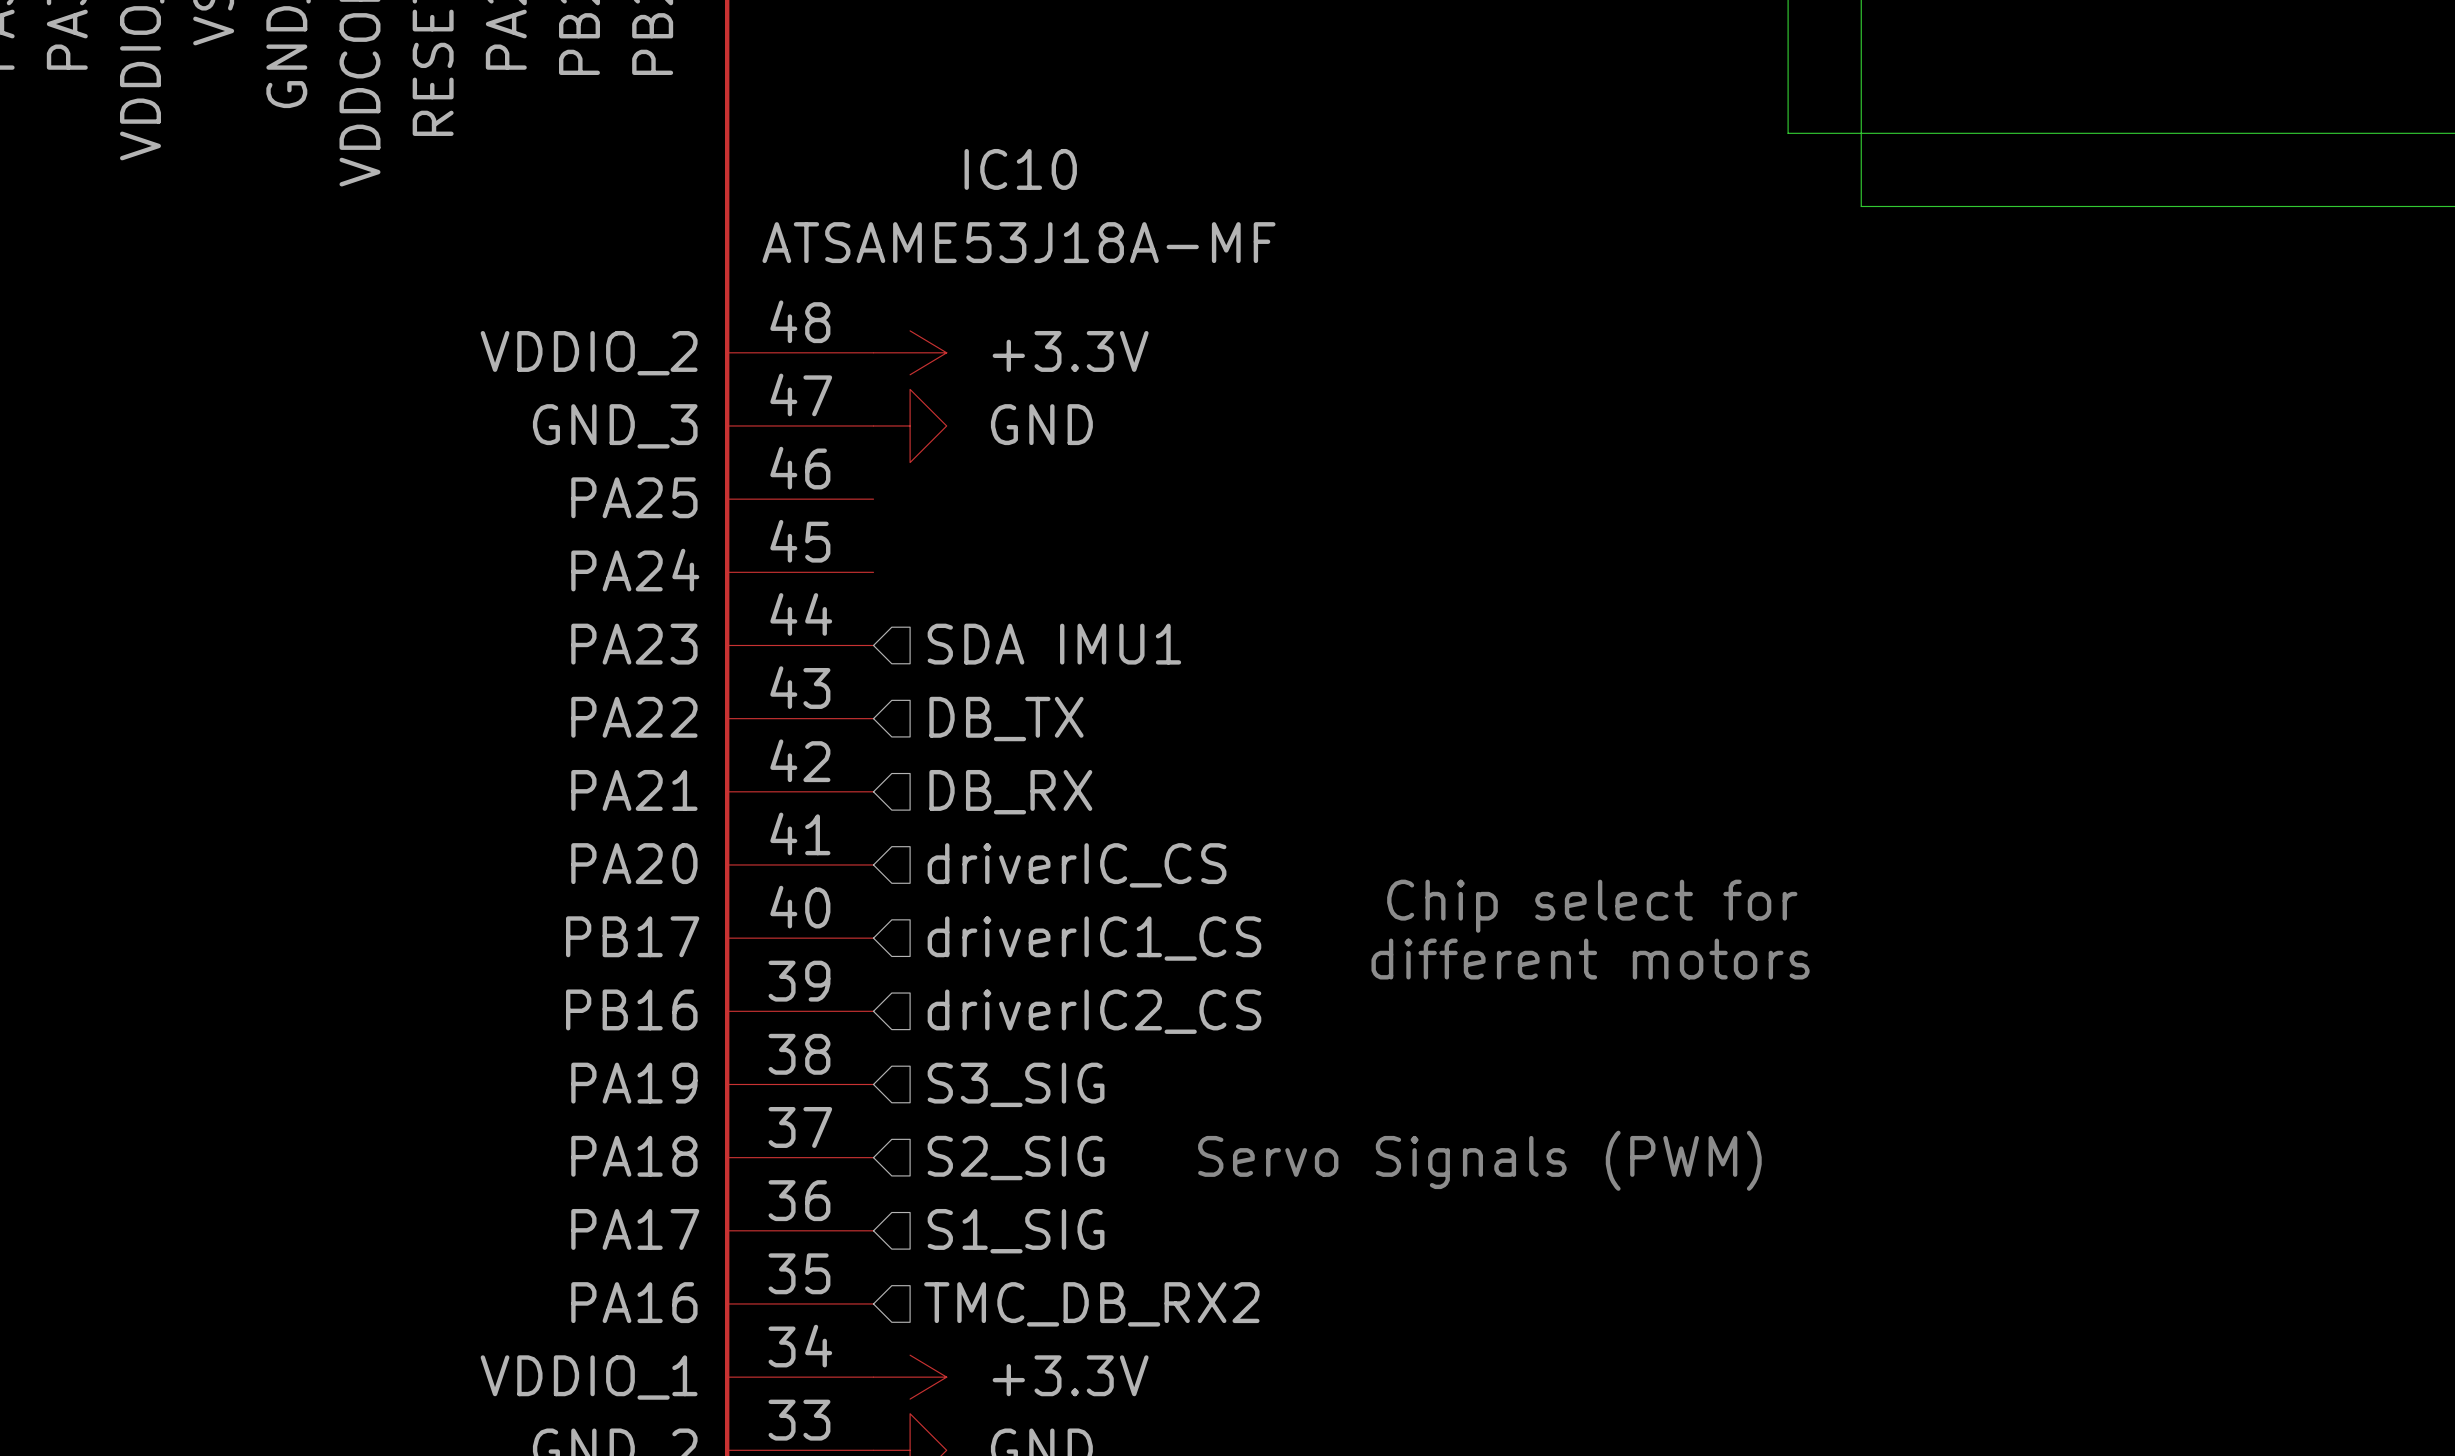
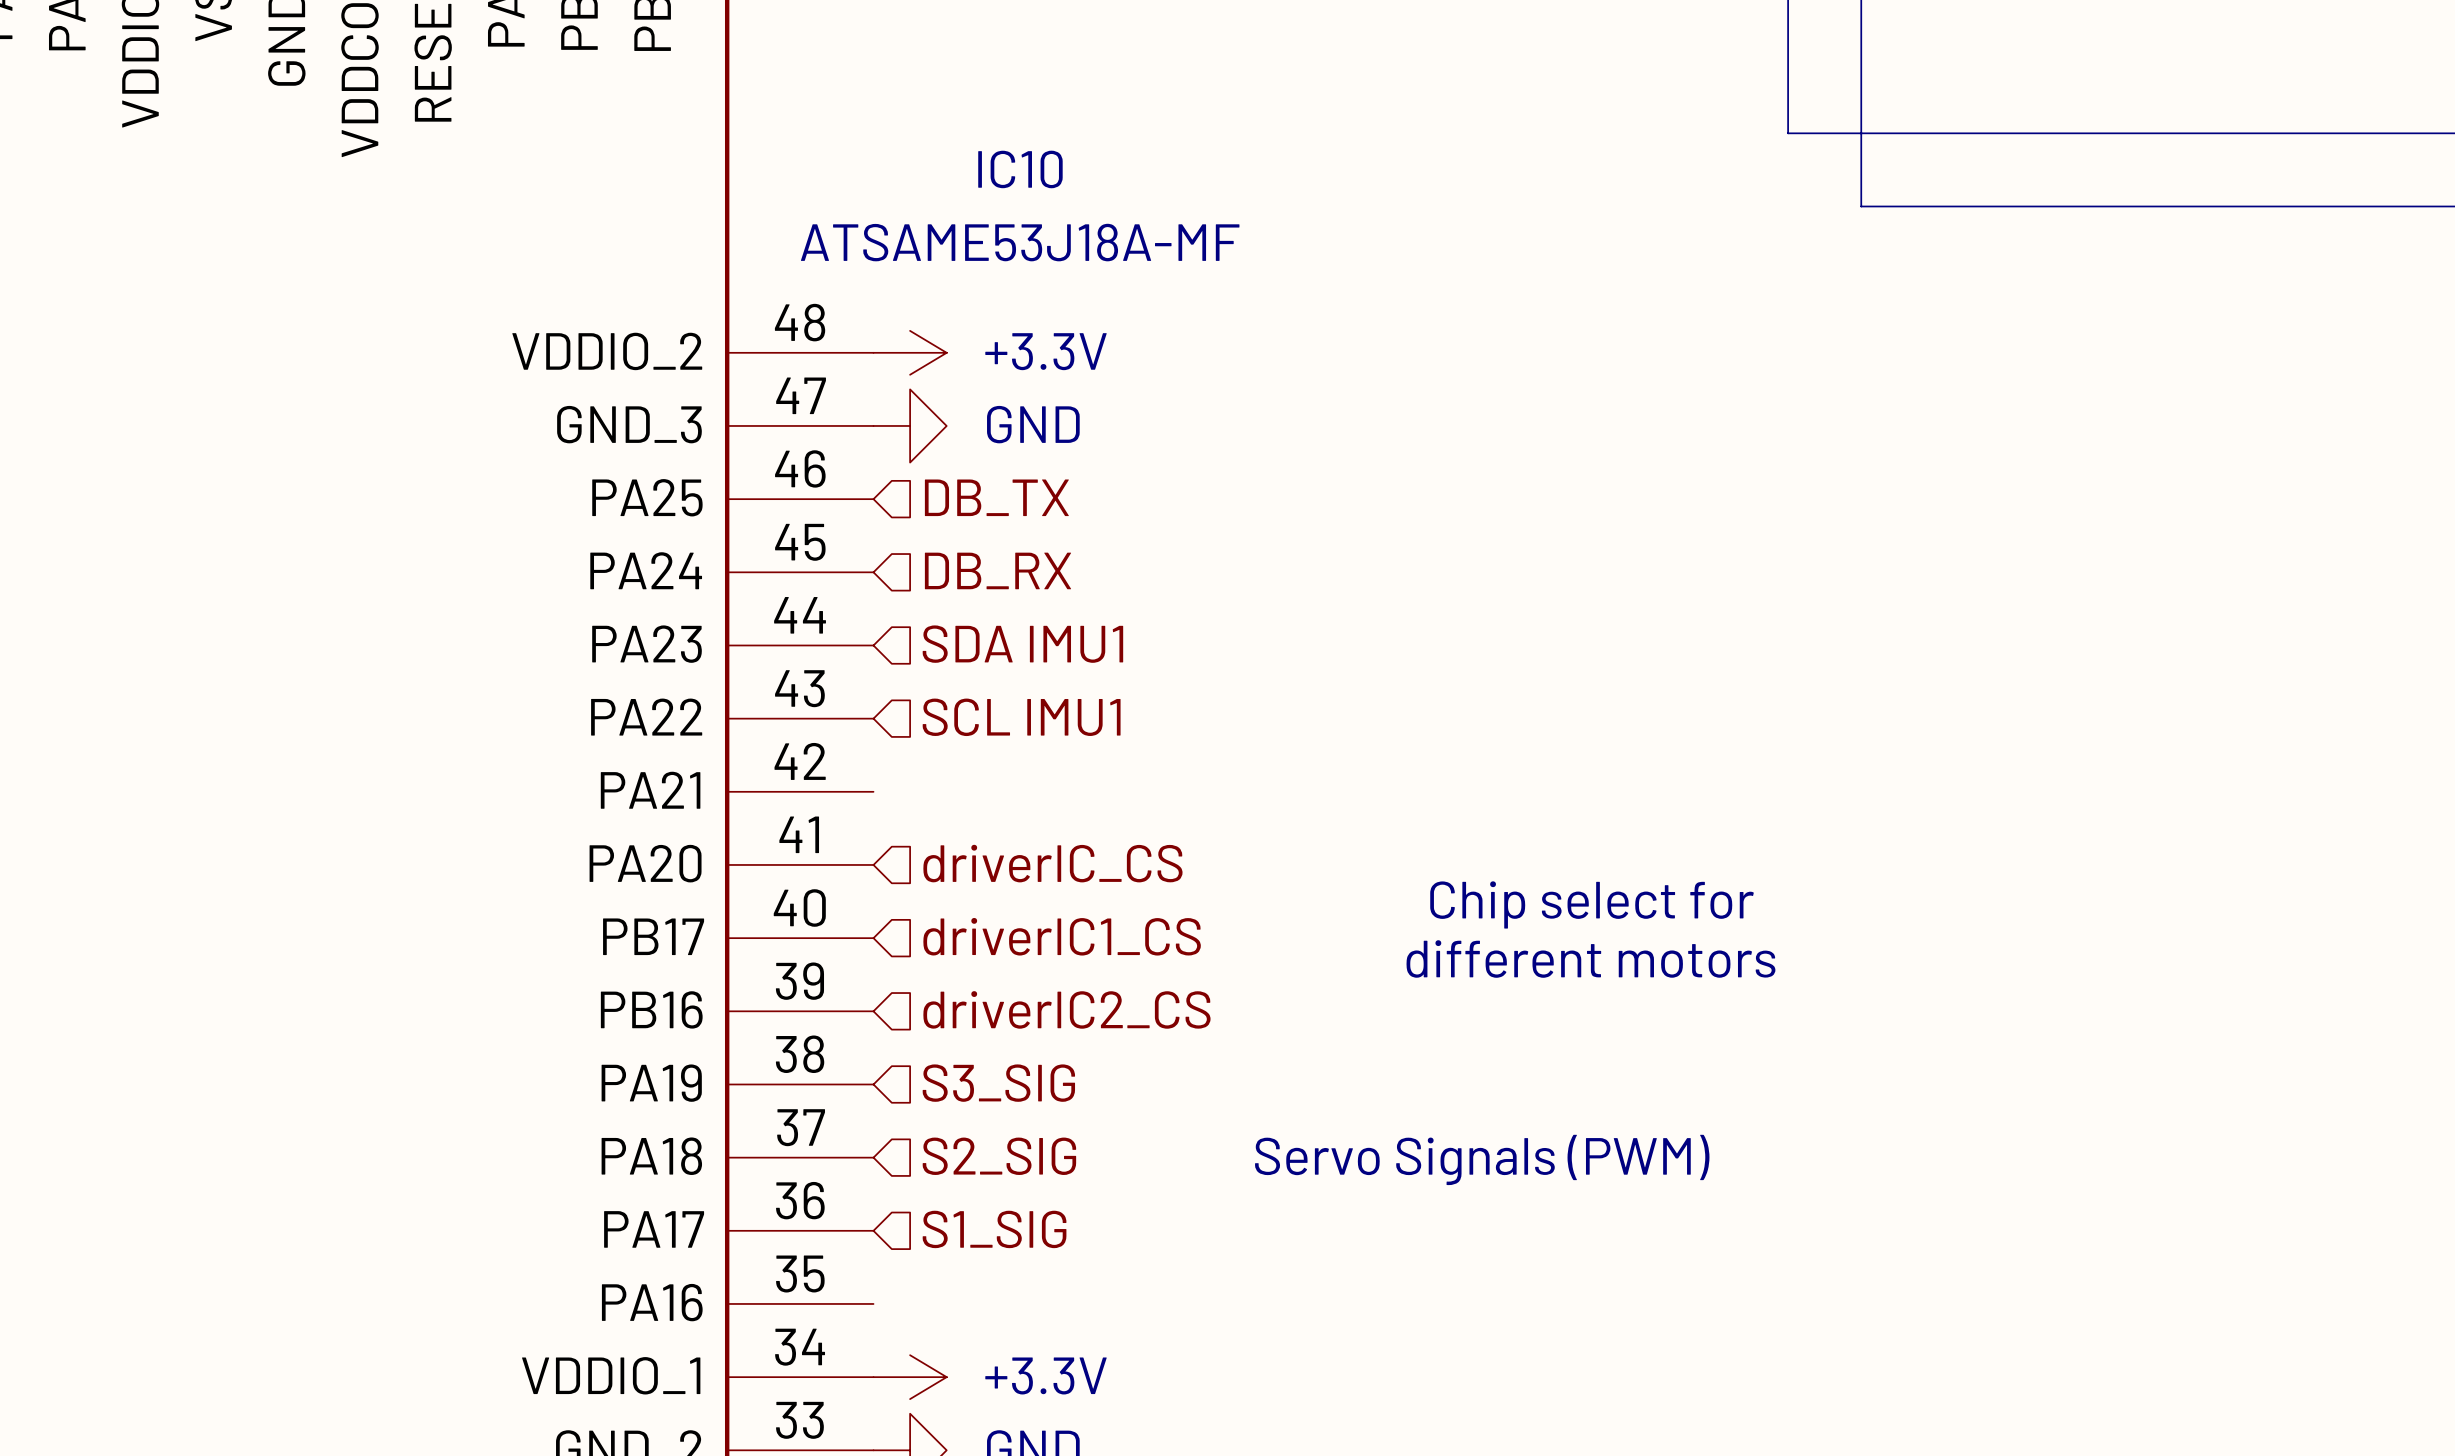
hierarchical label: none -> DB_TX (996, 497)
hierarchical label: DB_TX (1006, 719) -> SCL IMU1 (1021, 717)
hierarchical label position: DB_RX (1010, 792) -> DB_RX (998, 570)
hierarchical label: TMC_DB_RX2 (1091, 1304) -> none

